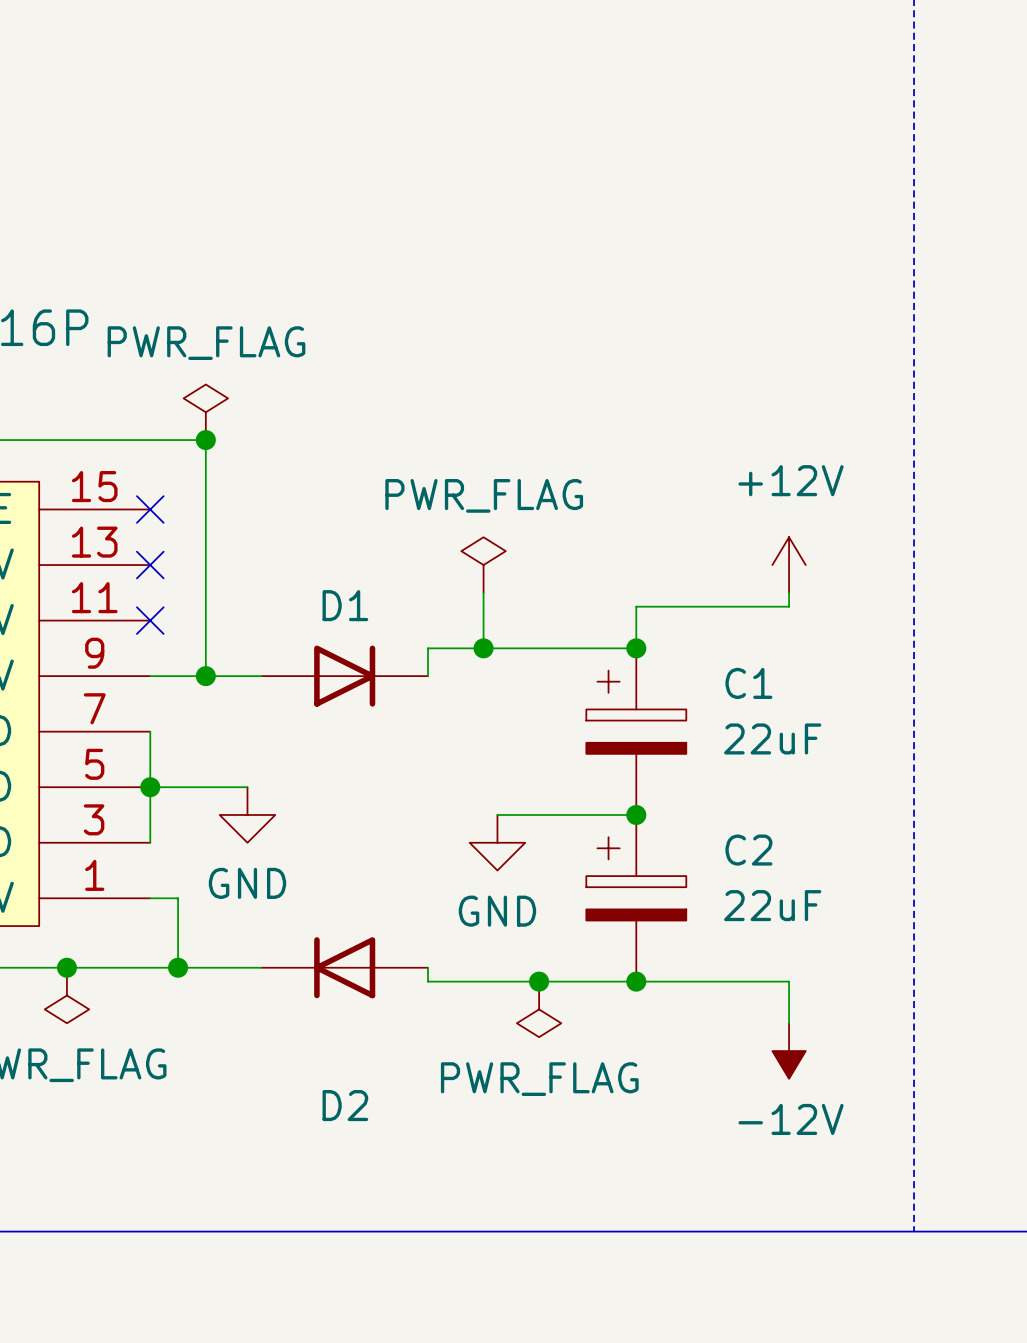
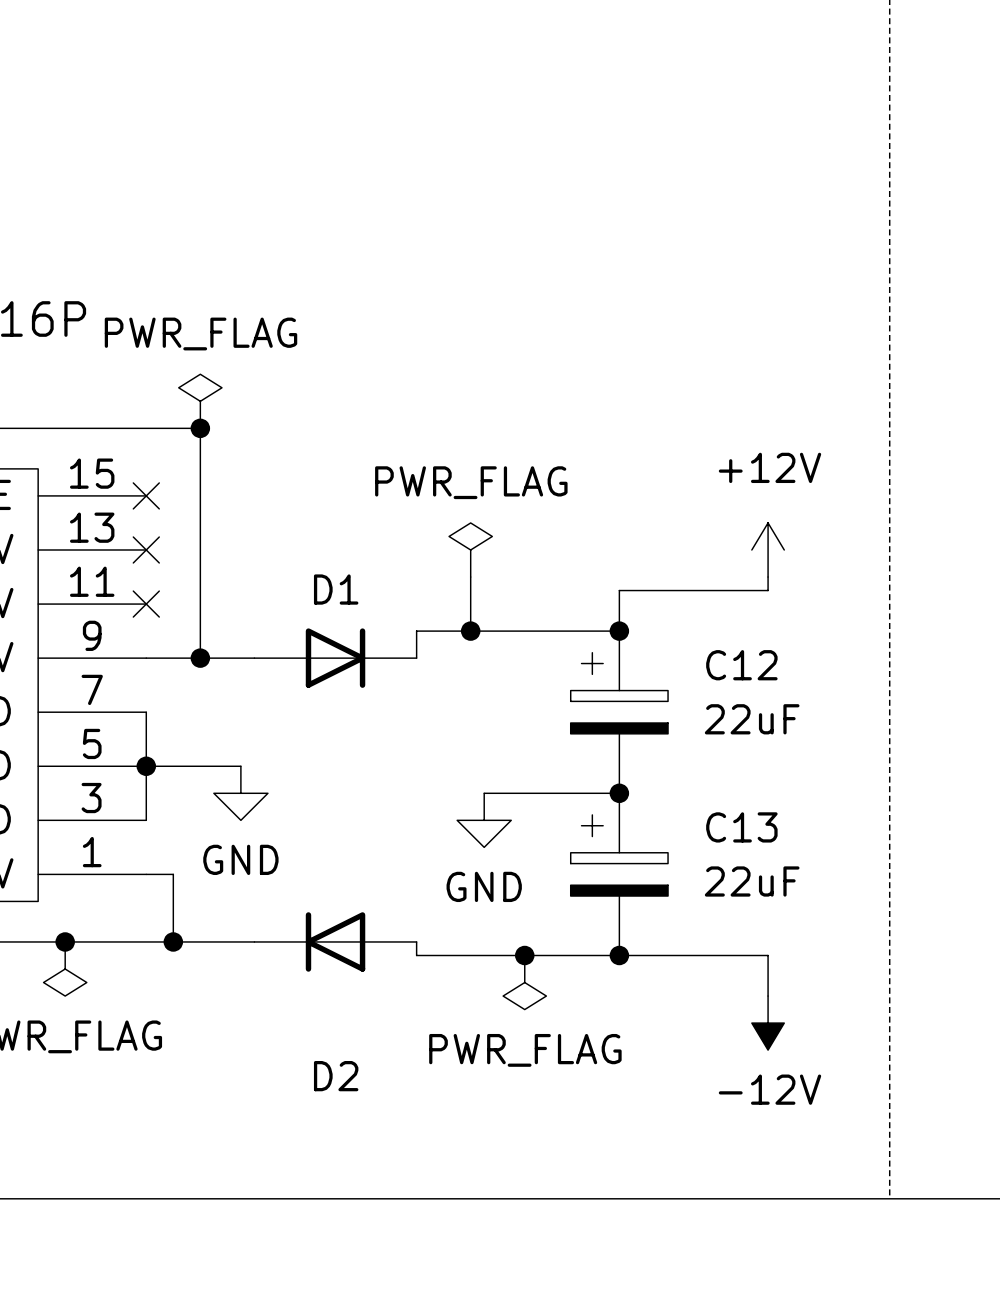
C1 name: C1 (748, 683) -> C12 (741, 665)
C2 name: C2 (748, 850) -> C13 (741, 827)

